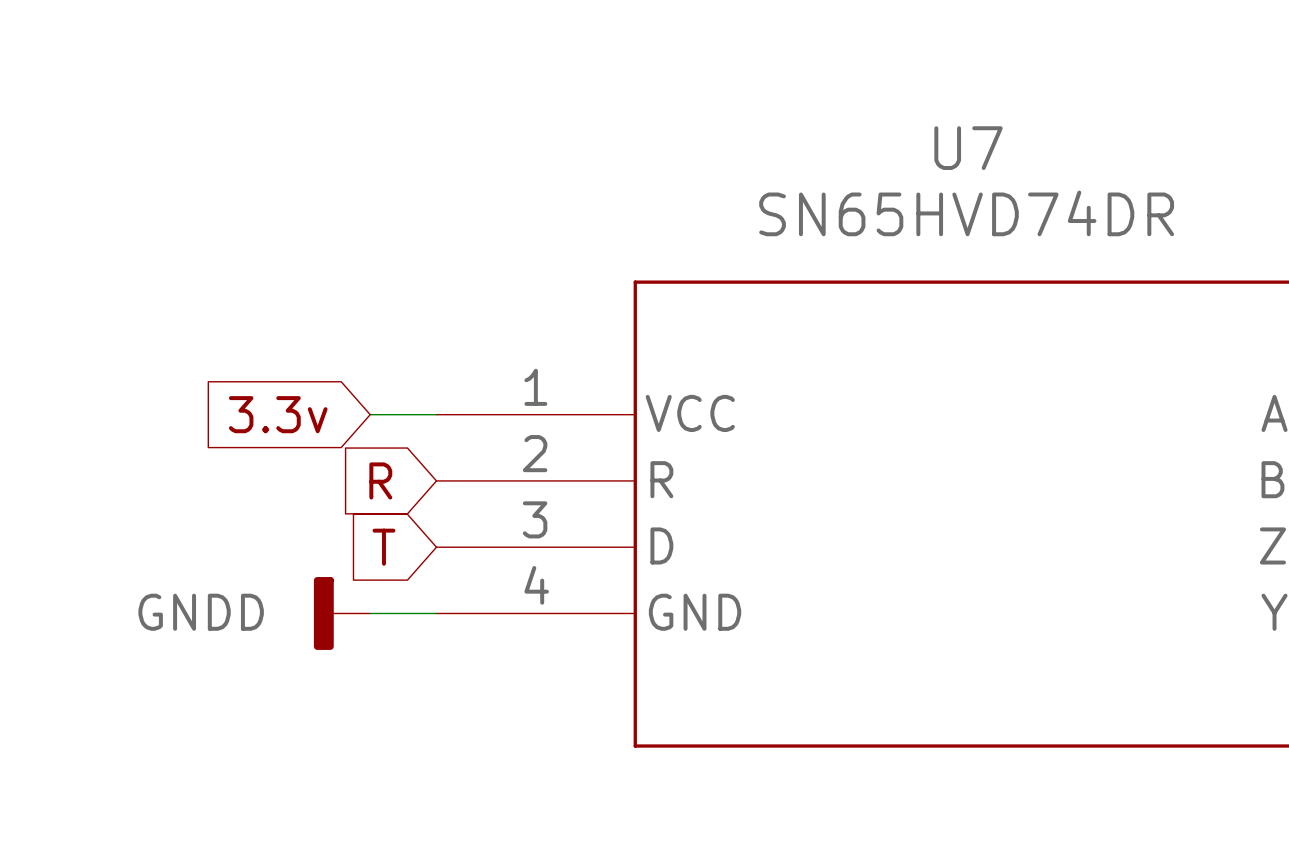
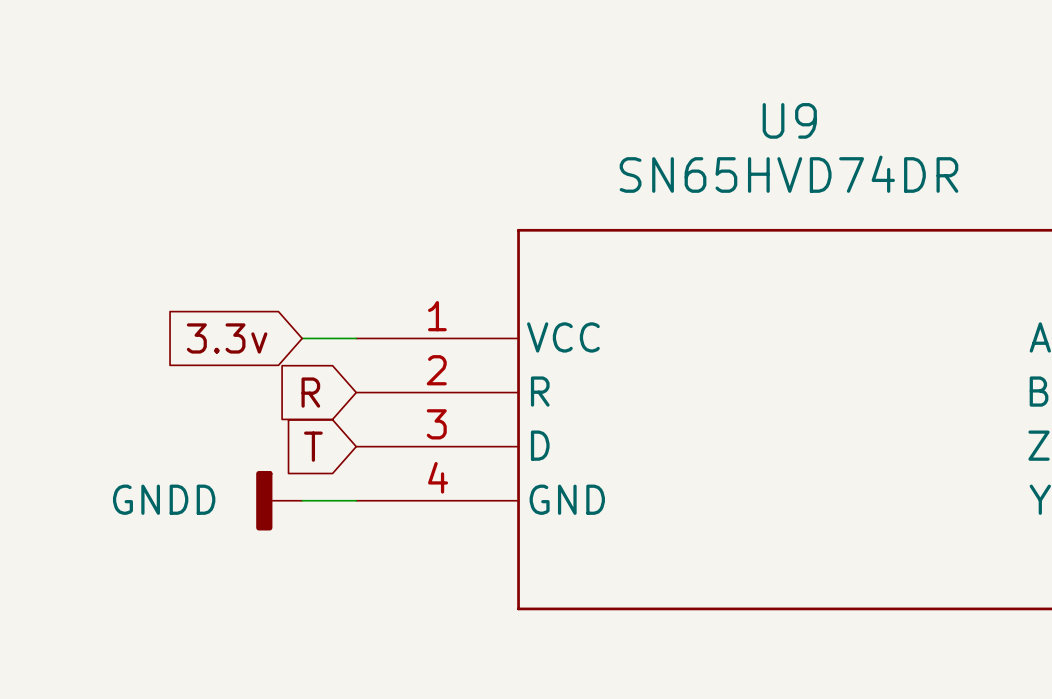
U7 name: U7 (968, 148) -> U9 (789, 120)

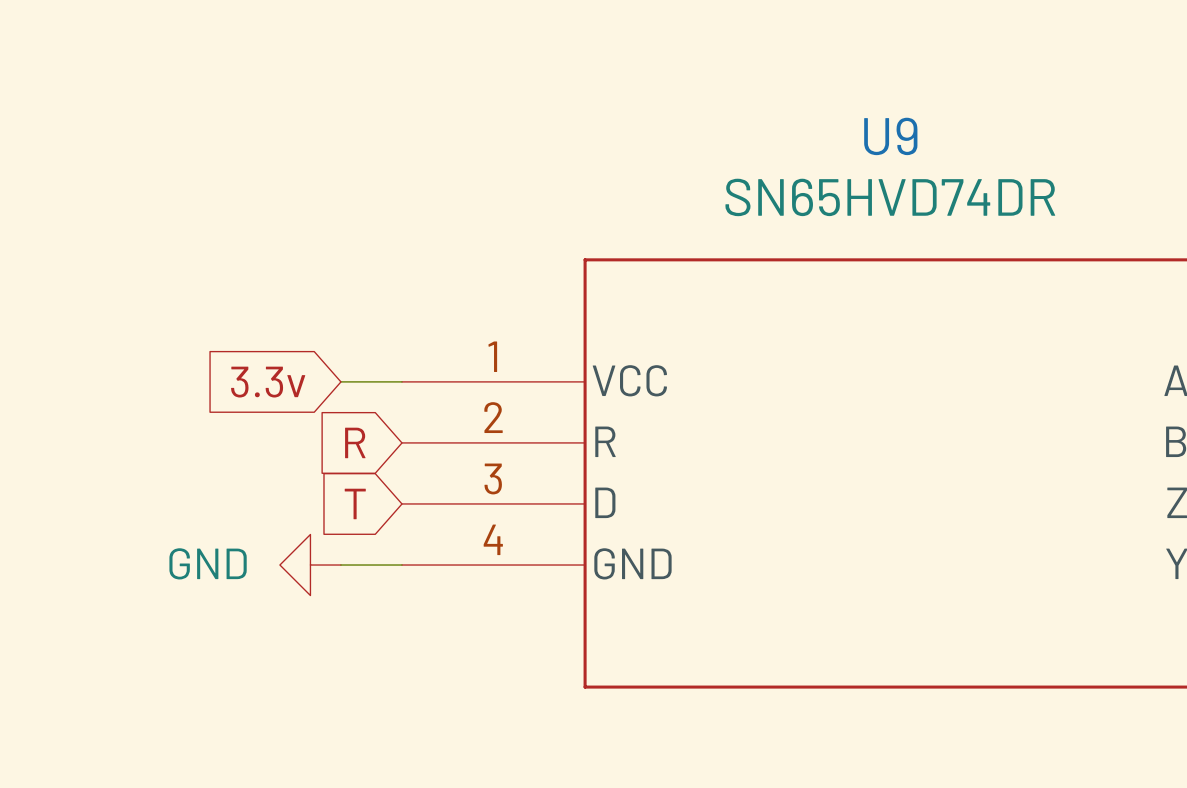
power symbol: GNDD (279, 500) -> GND (310, 565)

